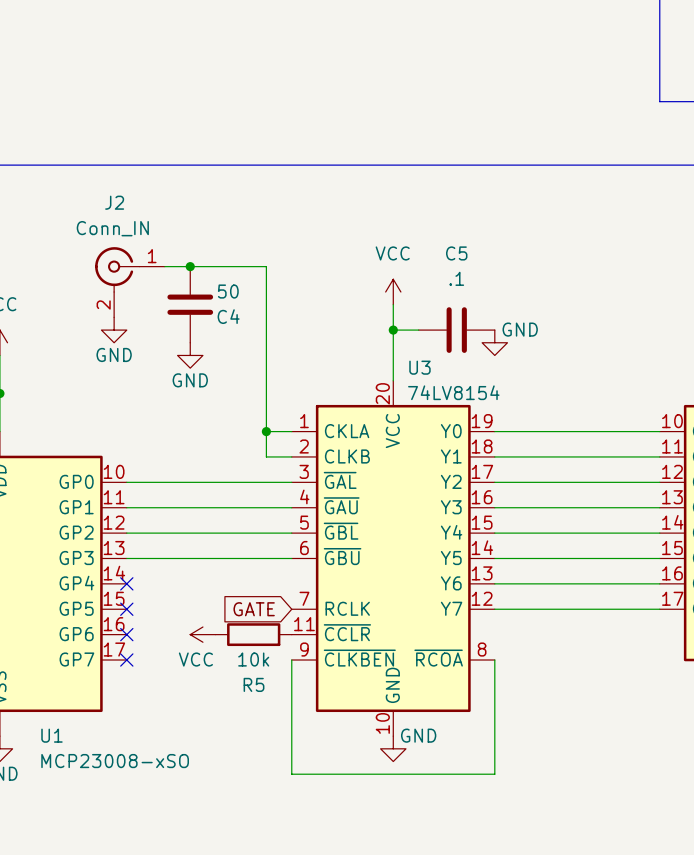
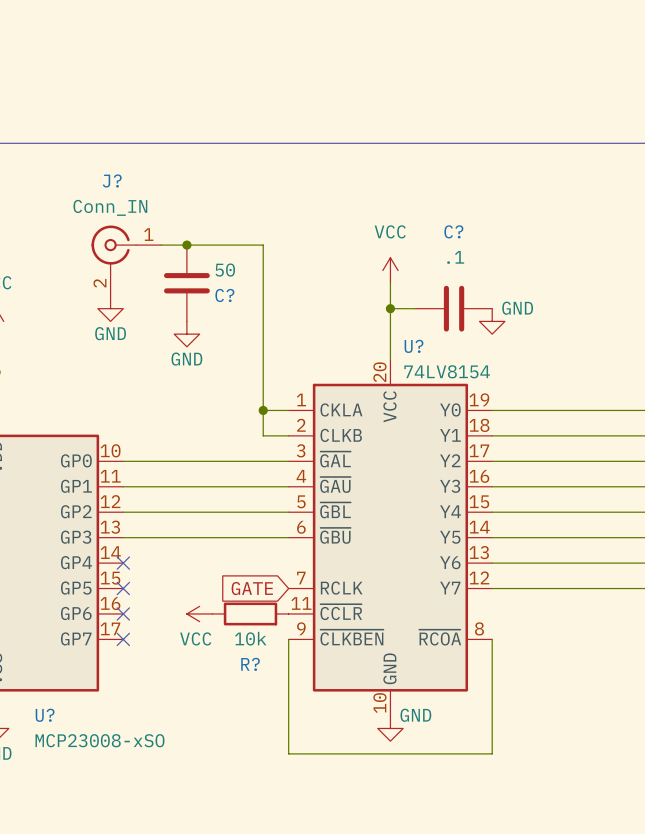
J2 name: J2 (114, 202) -> J? (112, 181)
C5 name: C5 (456, 253) -> C? (453, 231)
C4 name: C4 (228, 316) -> C? (224, 295)
U3 name: U3 (419, 367) -> U? (414, 346)
R5 name: R5 (254, 684) -> R? (250, 664)
U1 name: U1 (51, 735) -> U? (45, 715)

